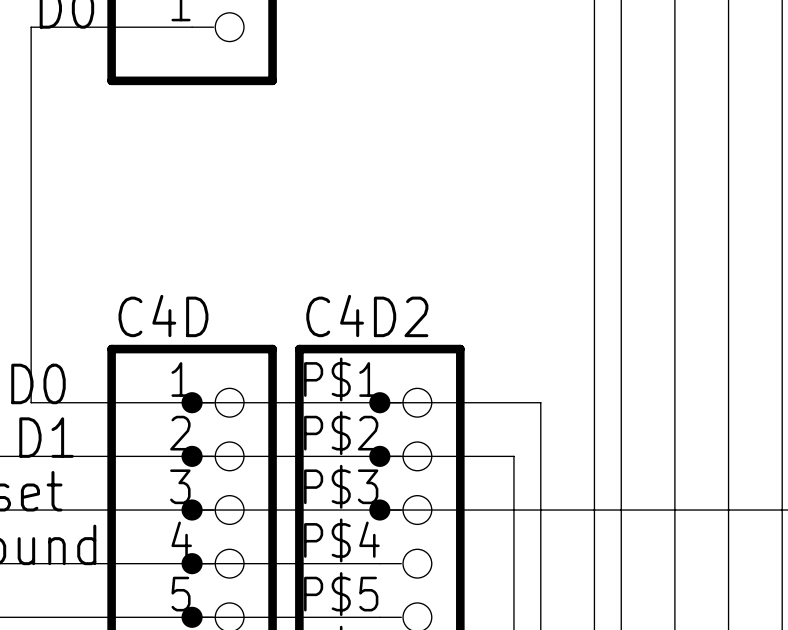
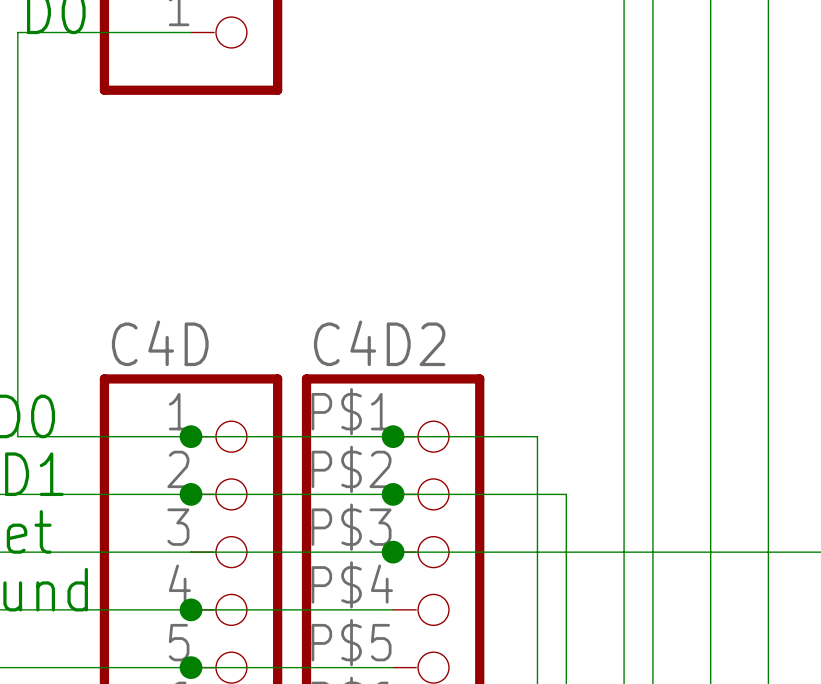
wire: (513, 402) (540, 402) (540, 456) -> (537, 436) (537, 494) (566, 494)
junction: (192, 510) -> none

